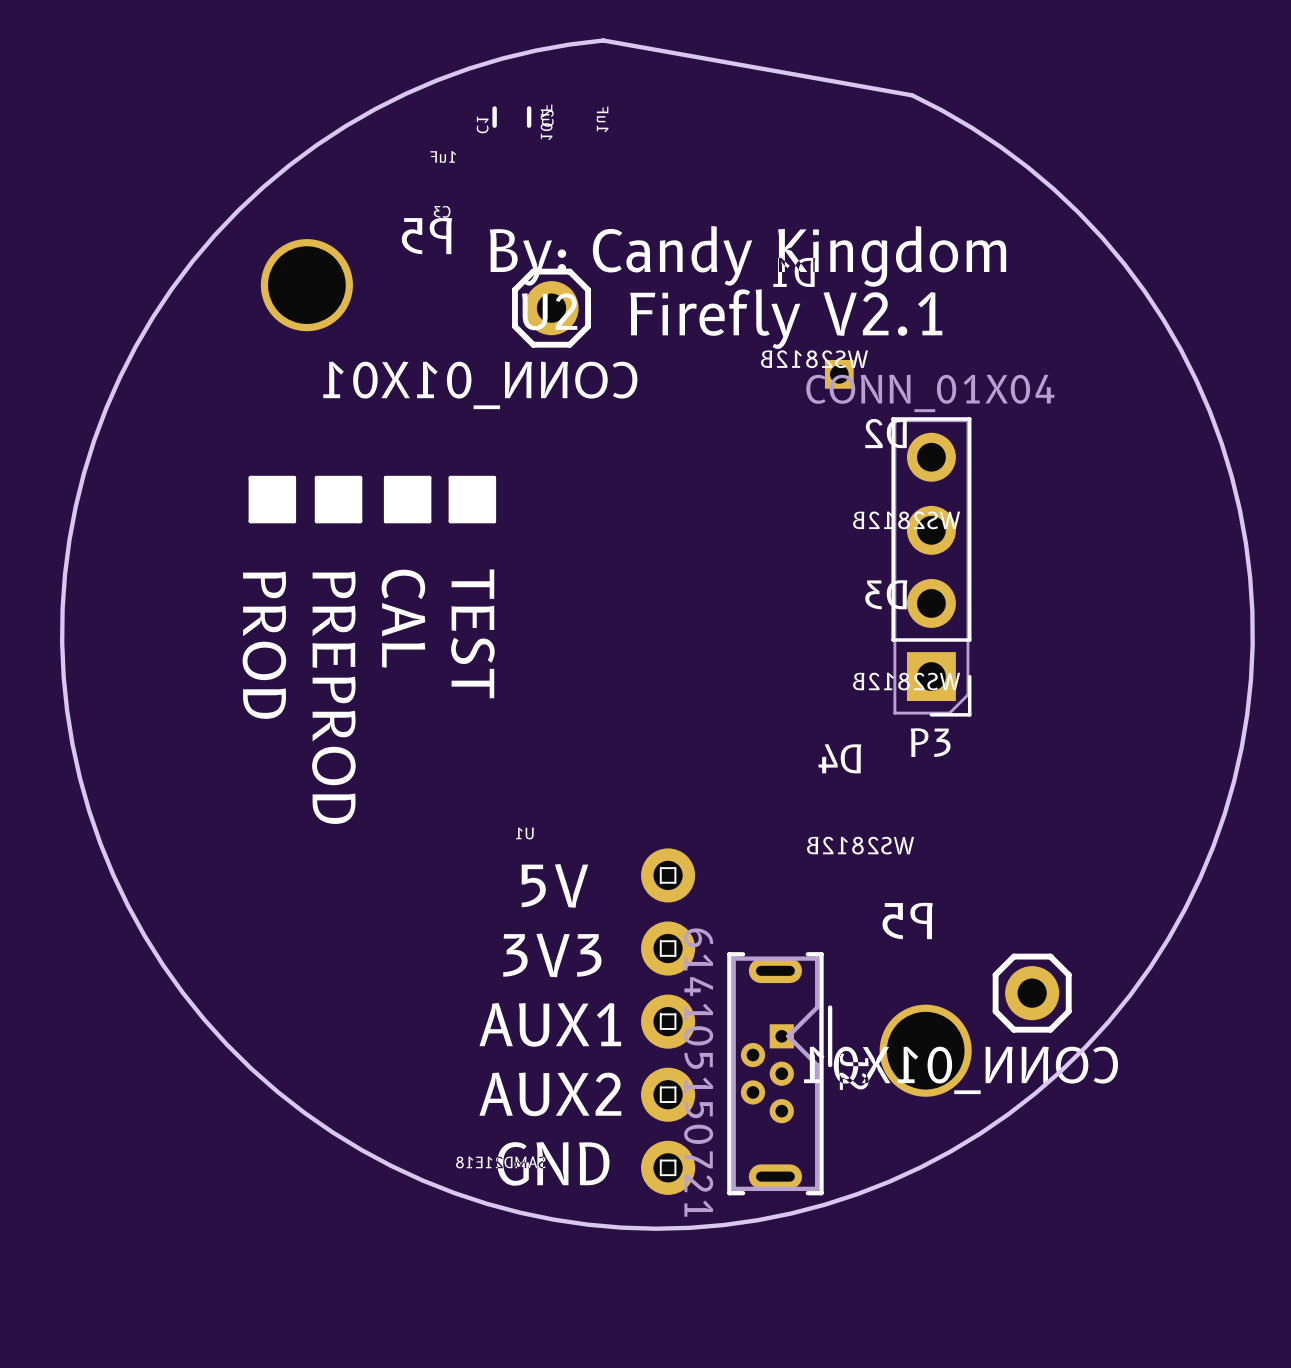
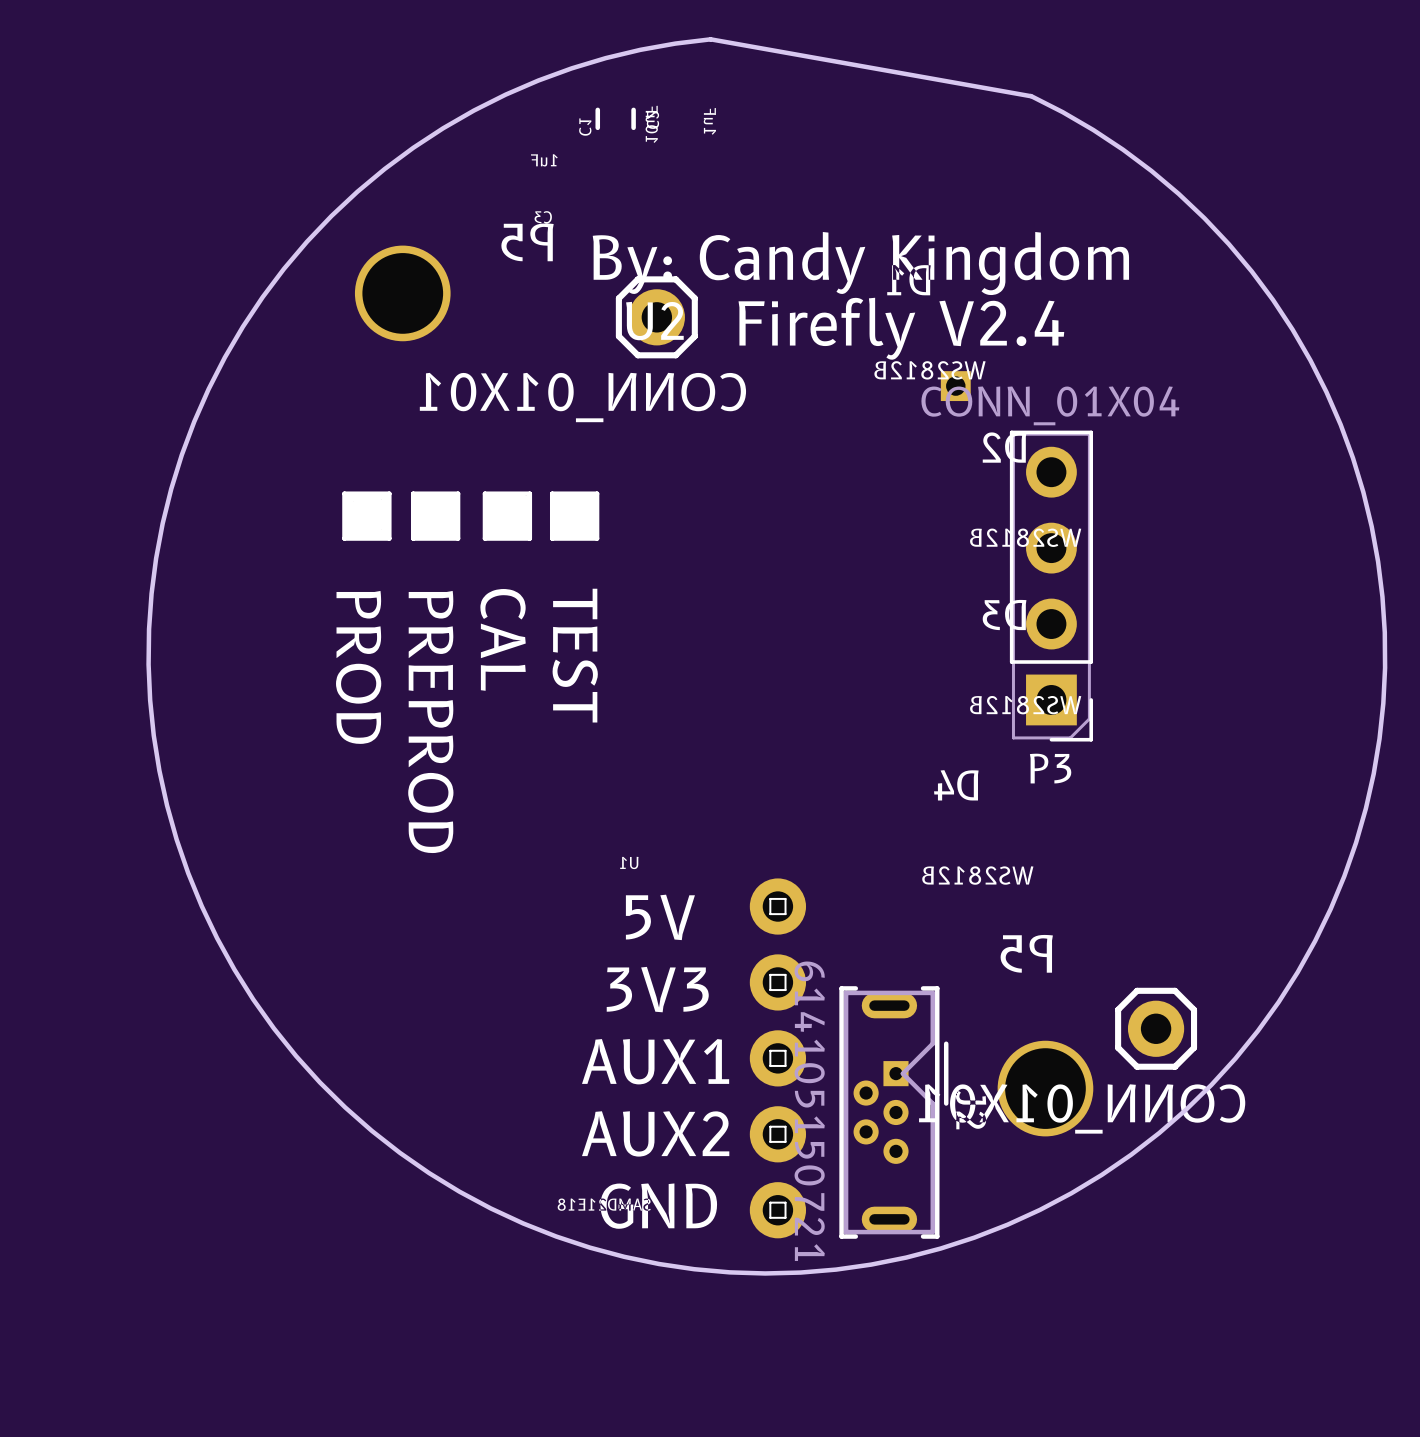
text: Firefly V2.1 (786, 319) -> Firefly V2.4 (901, 328)

